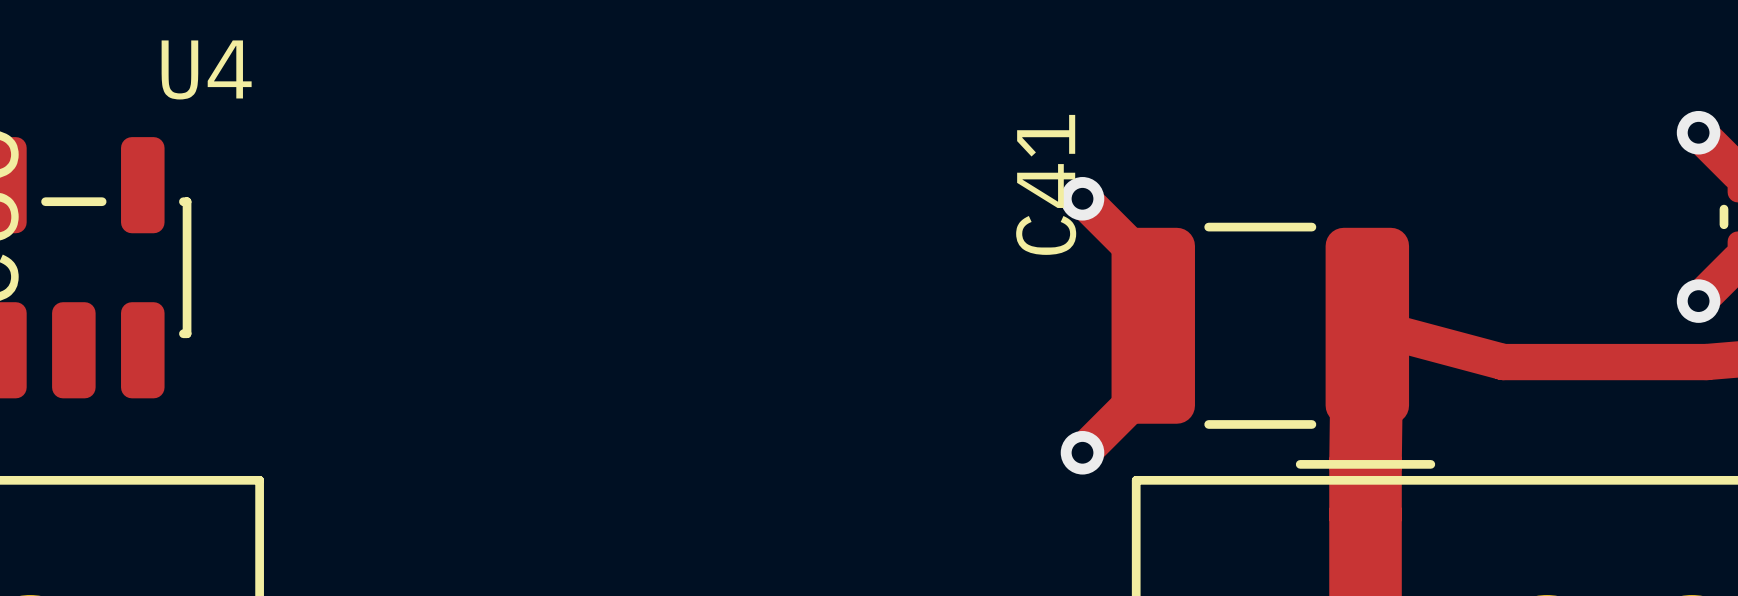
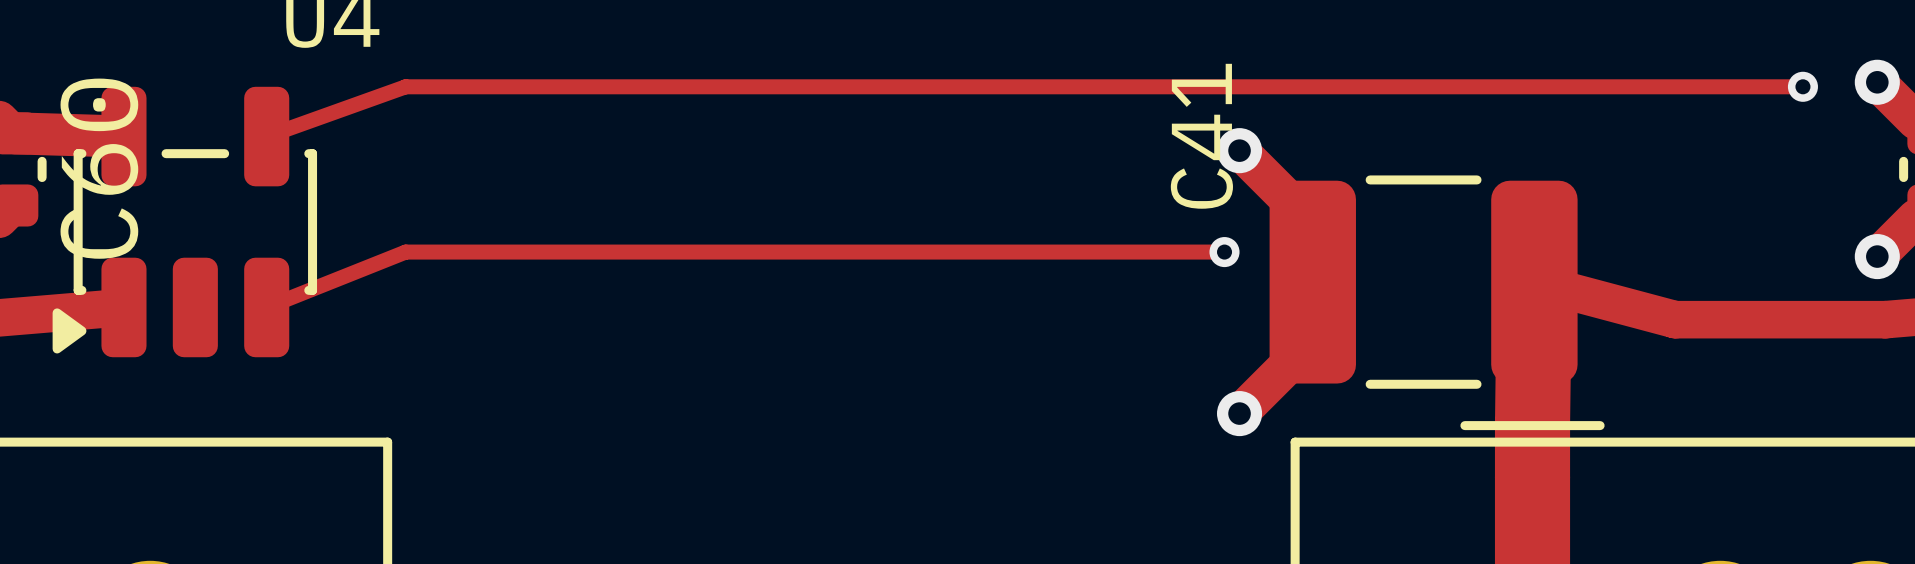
track: none -> (1802, 86) (405, 86) (266, 136)
via: none -> (1802, 86)
track: none -> (1224, 252) (405, 252) (266, 307)
via: none -> (1224, 252)

